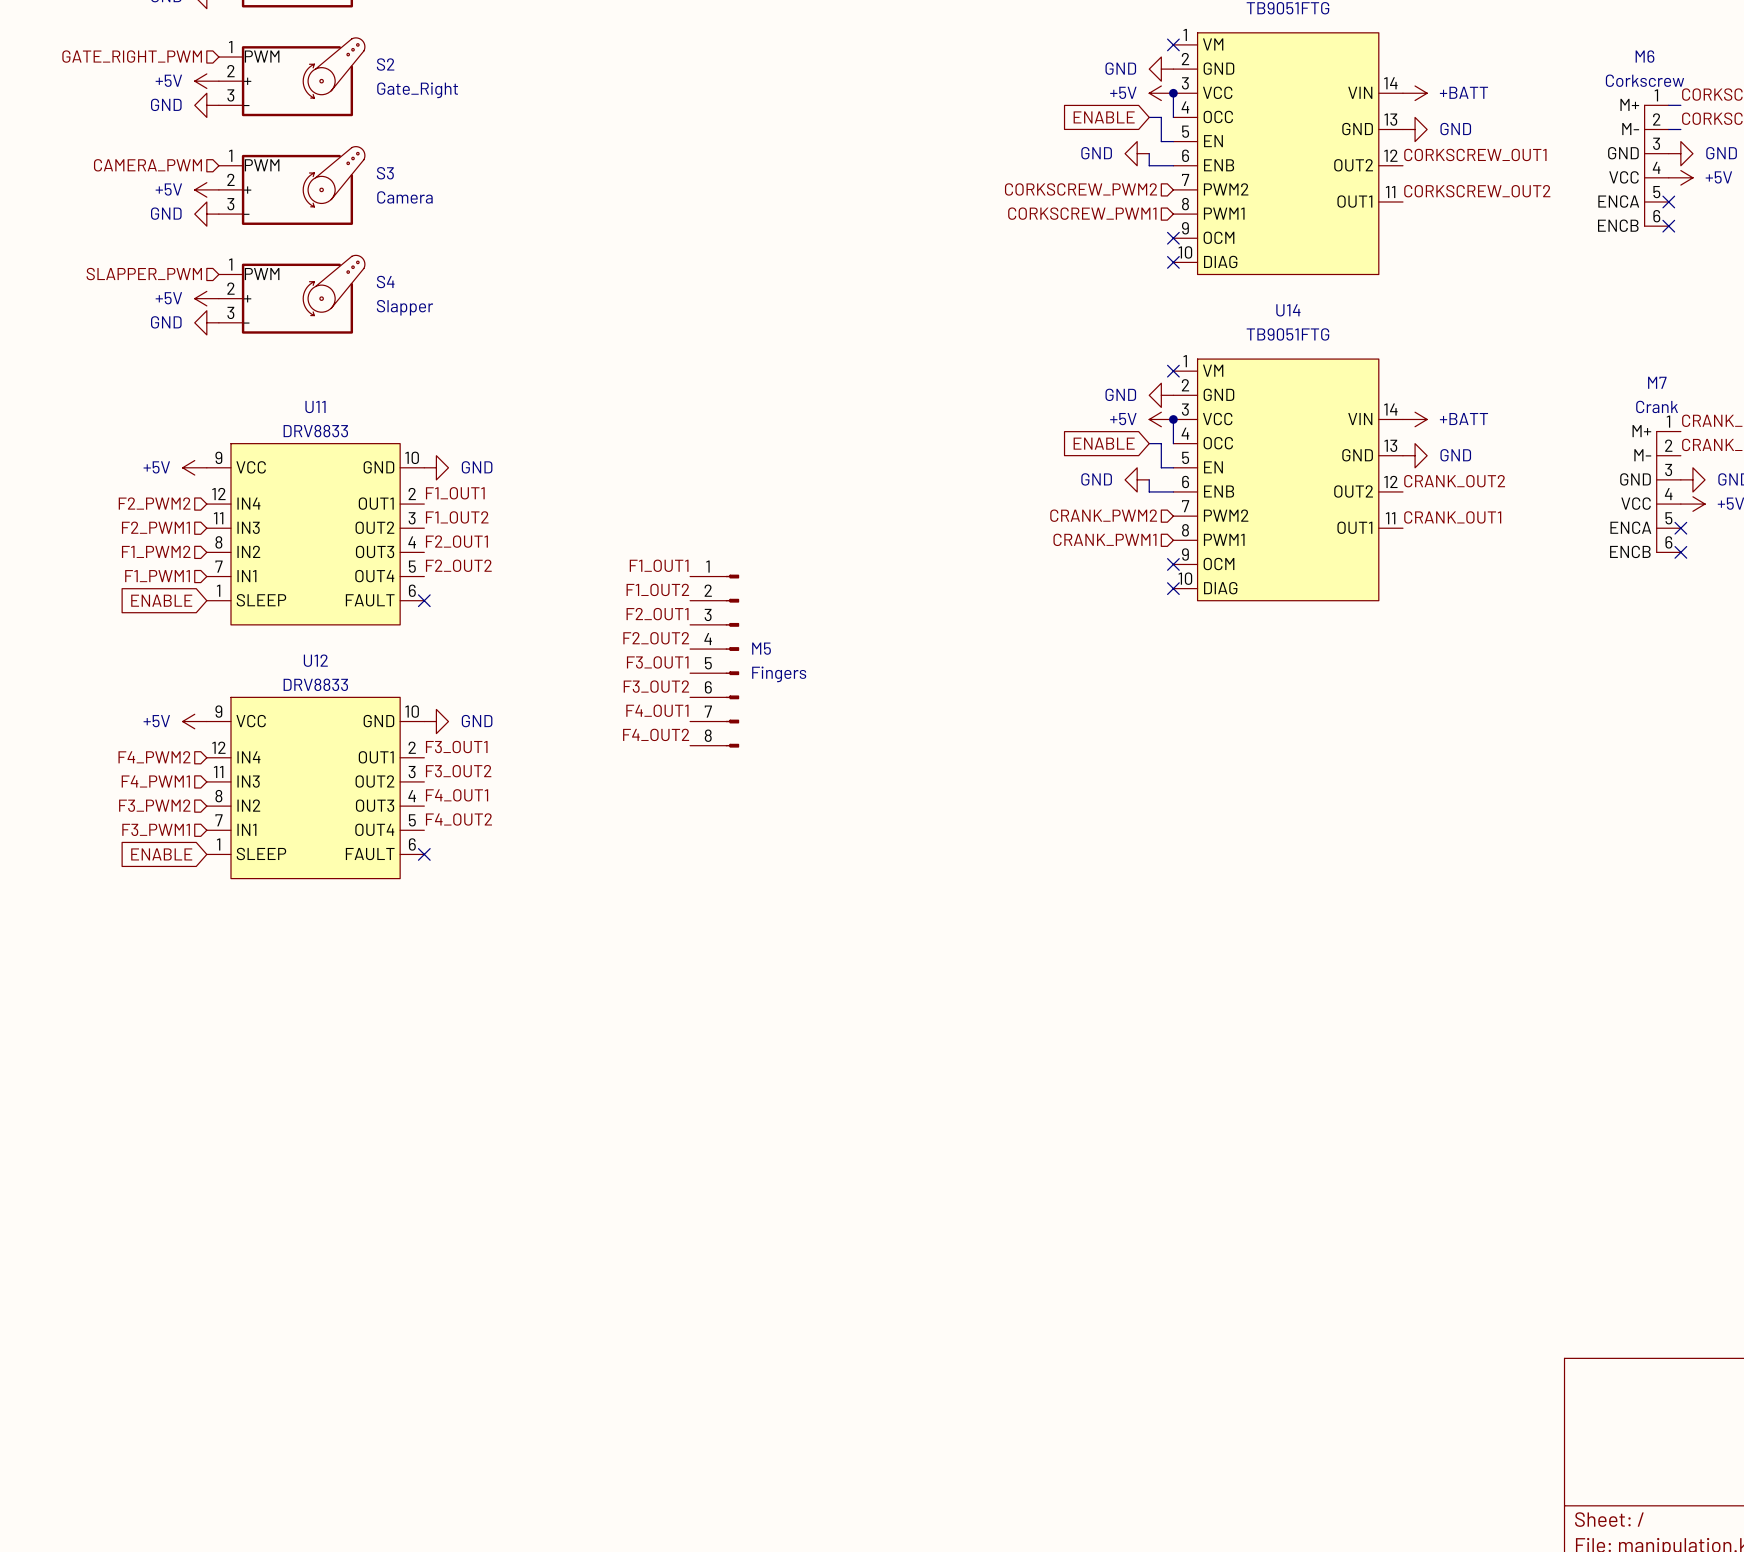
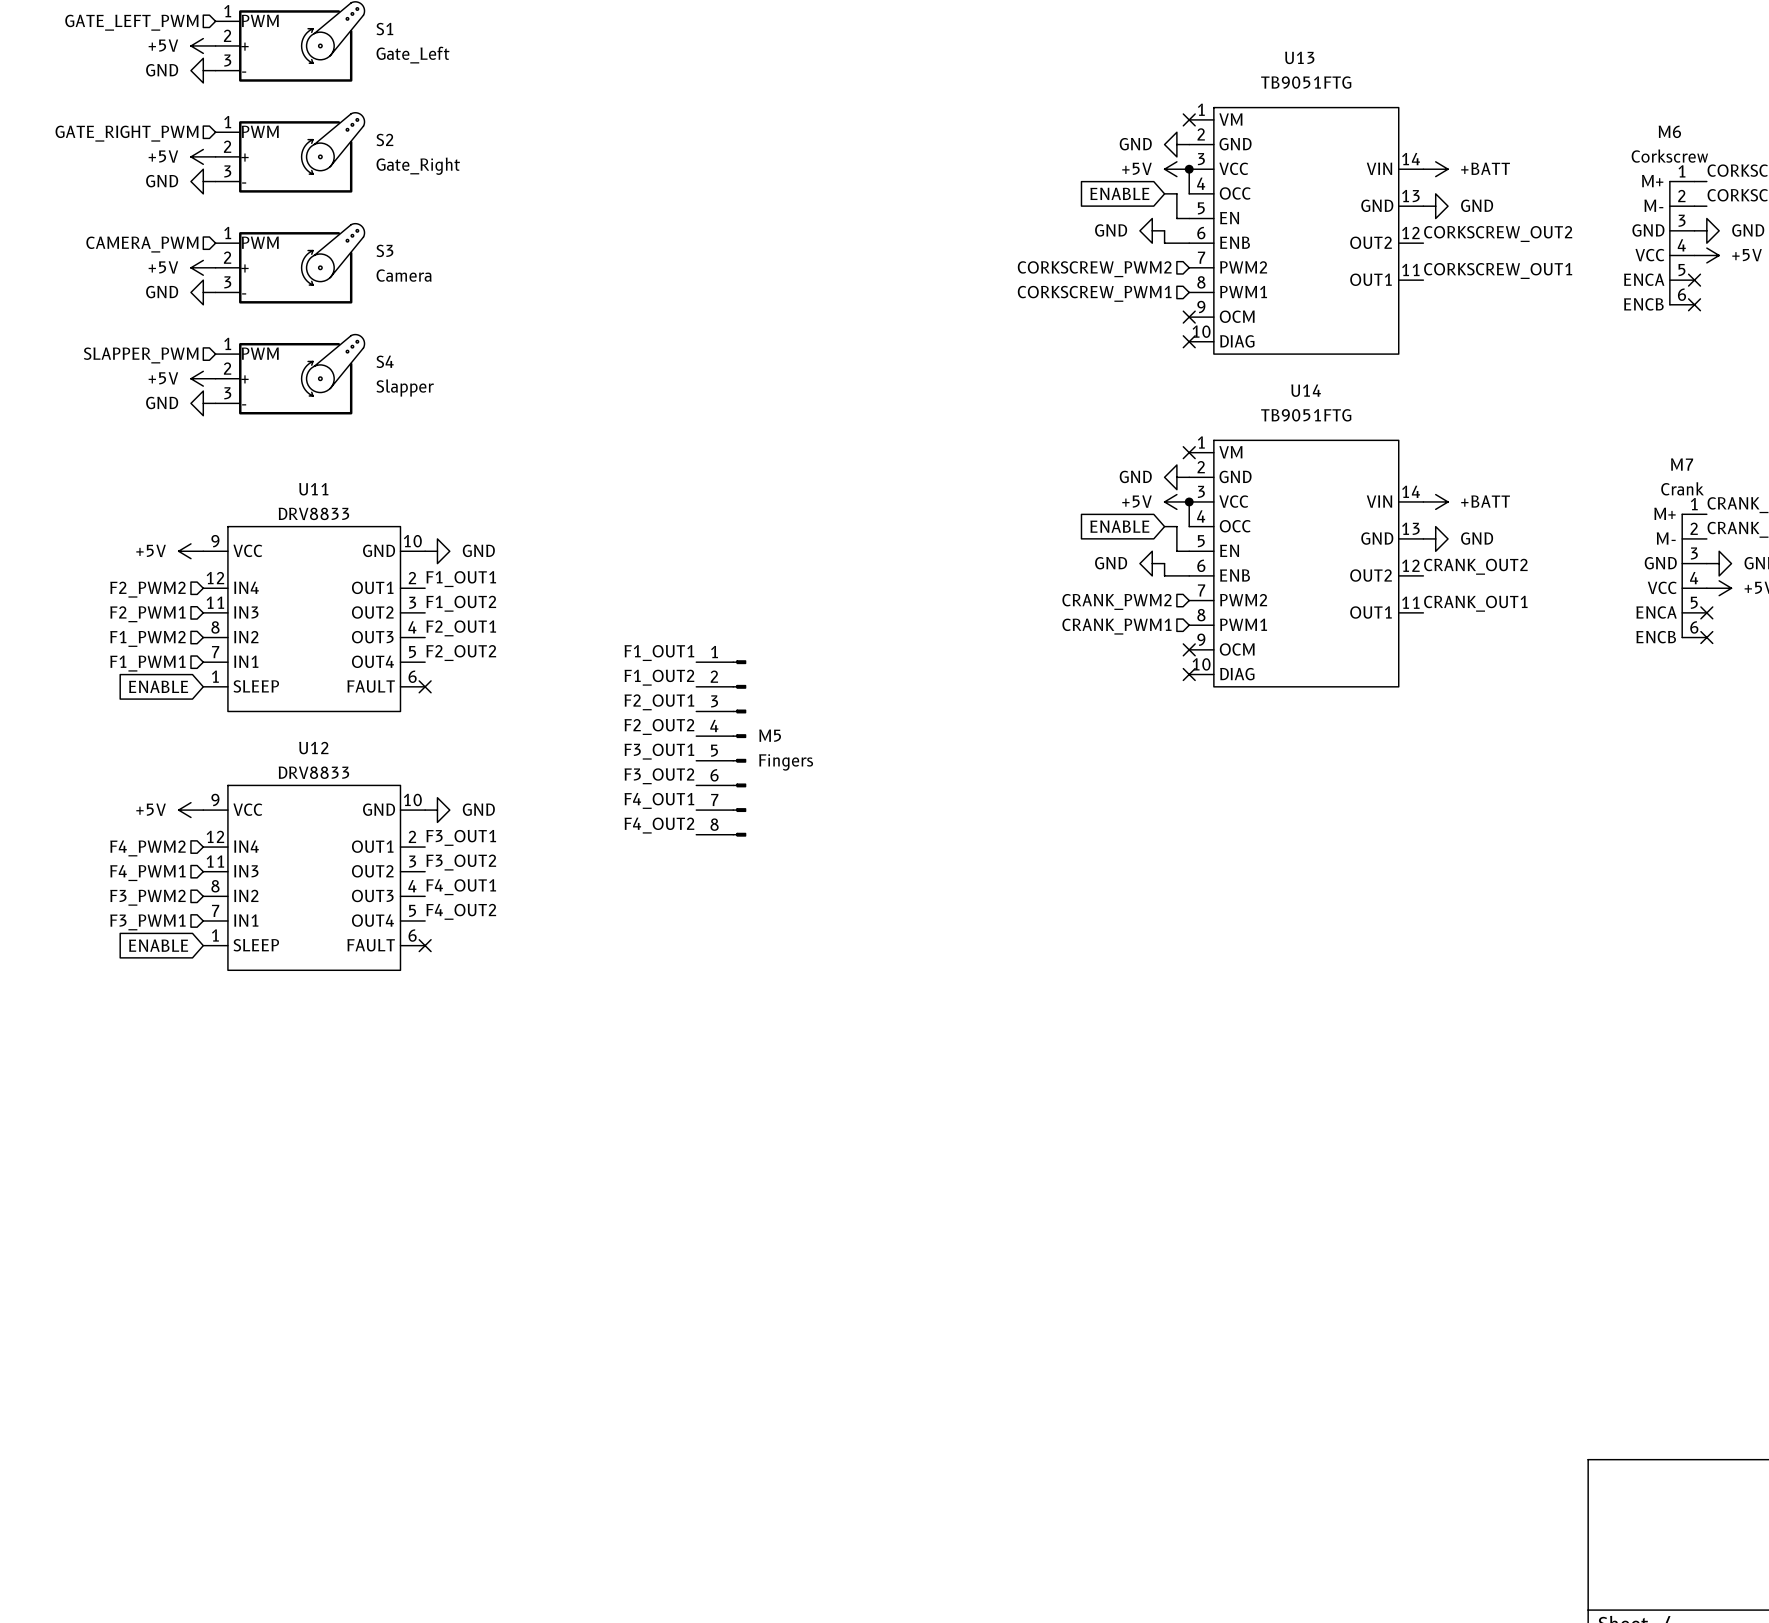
label: CORKSCREW_OUT1 (1475, 154) -> CORKSCREW_OUT2 (1498, 234)
label: CORKSCREW_OUT2 (1477, 191) -> CORKSCREW_OUT1 (1498, 270)

